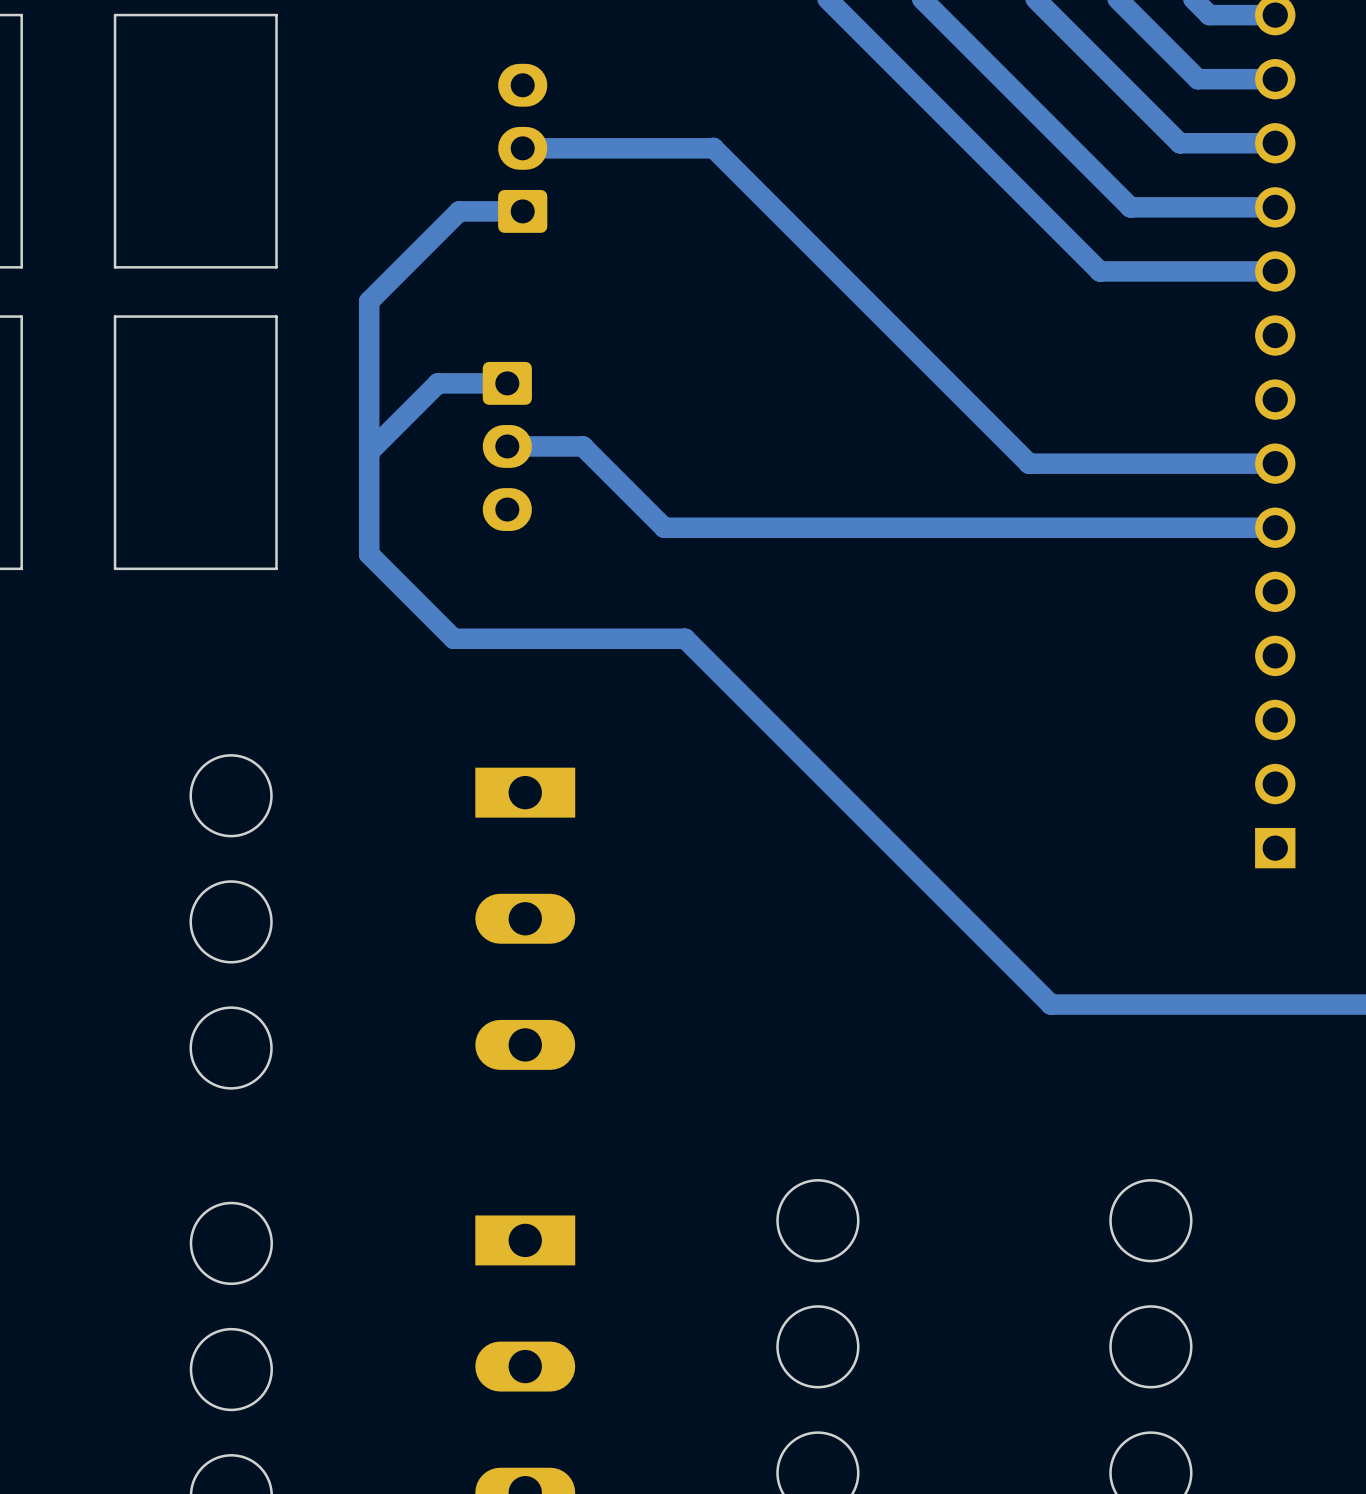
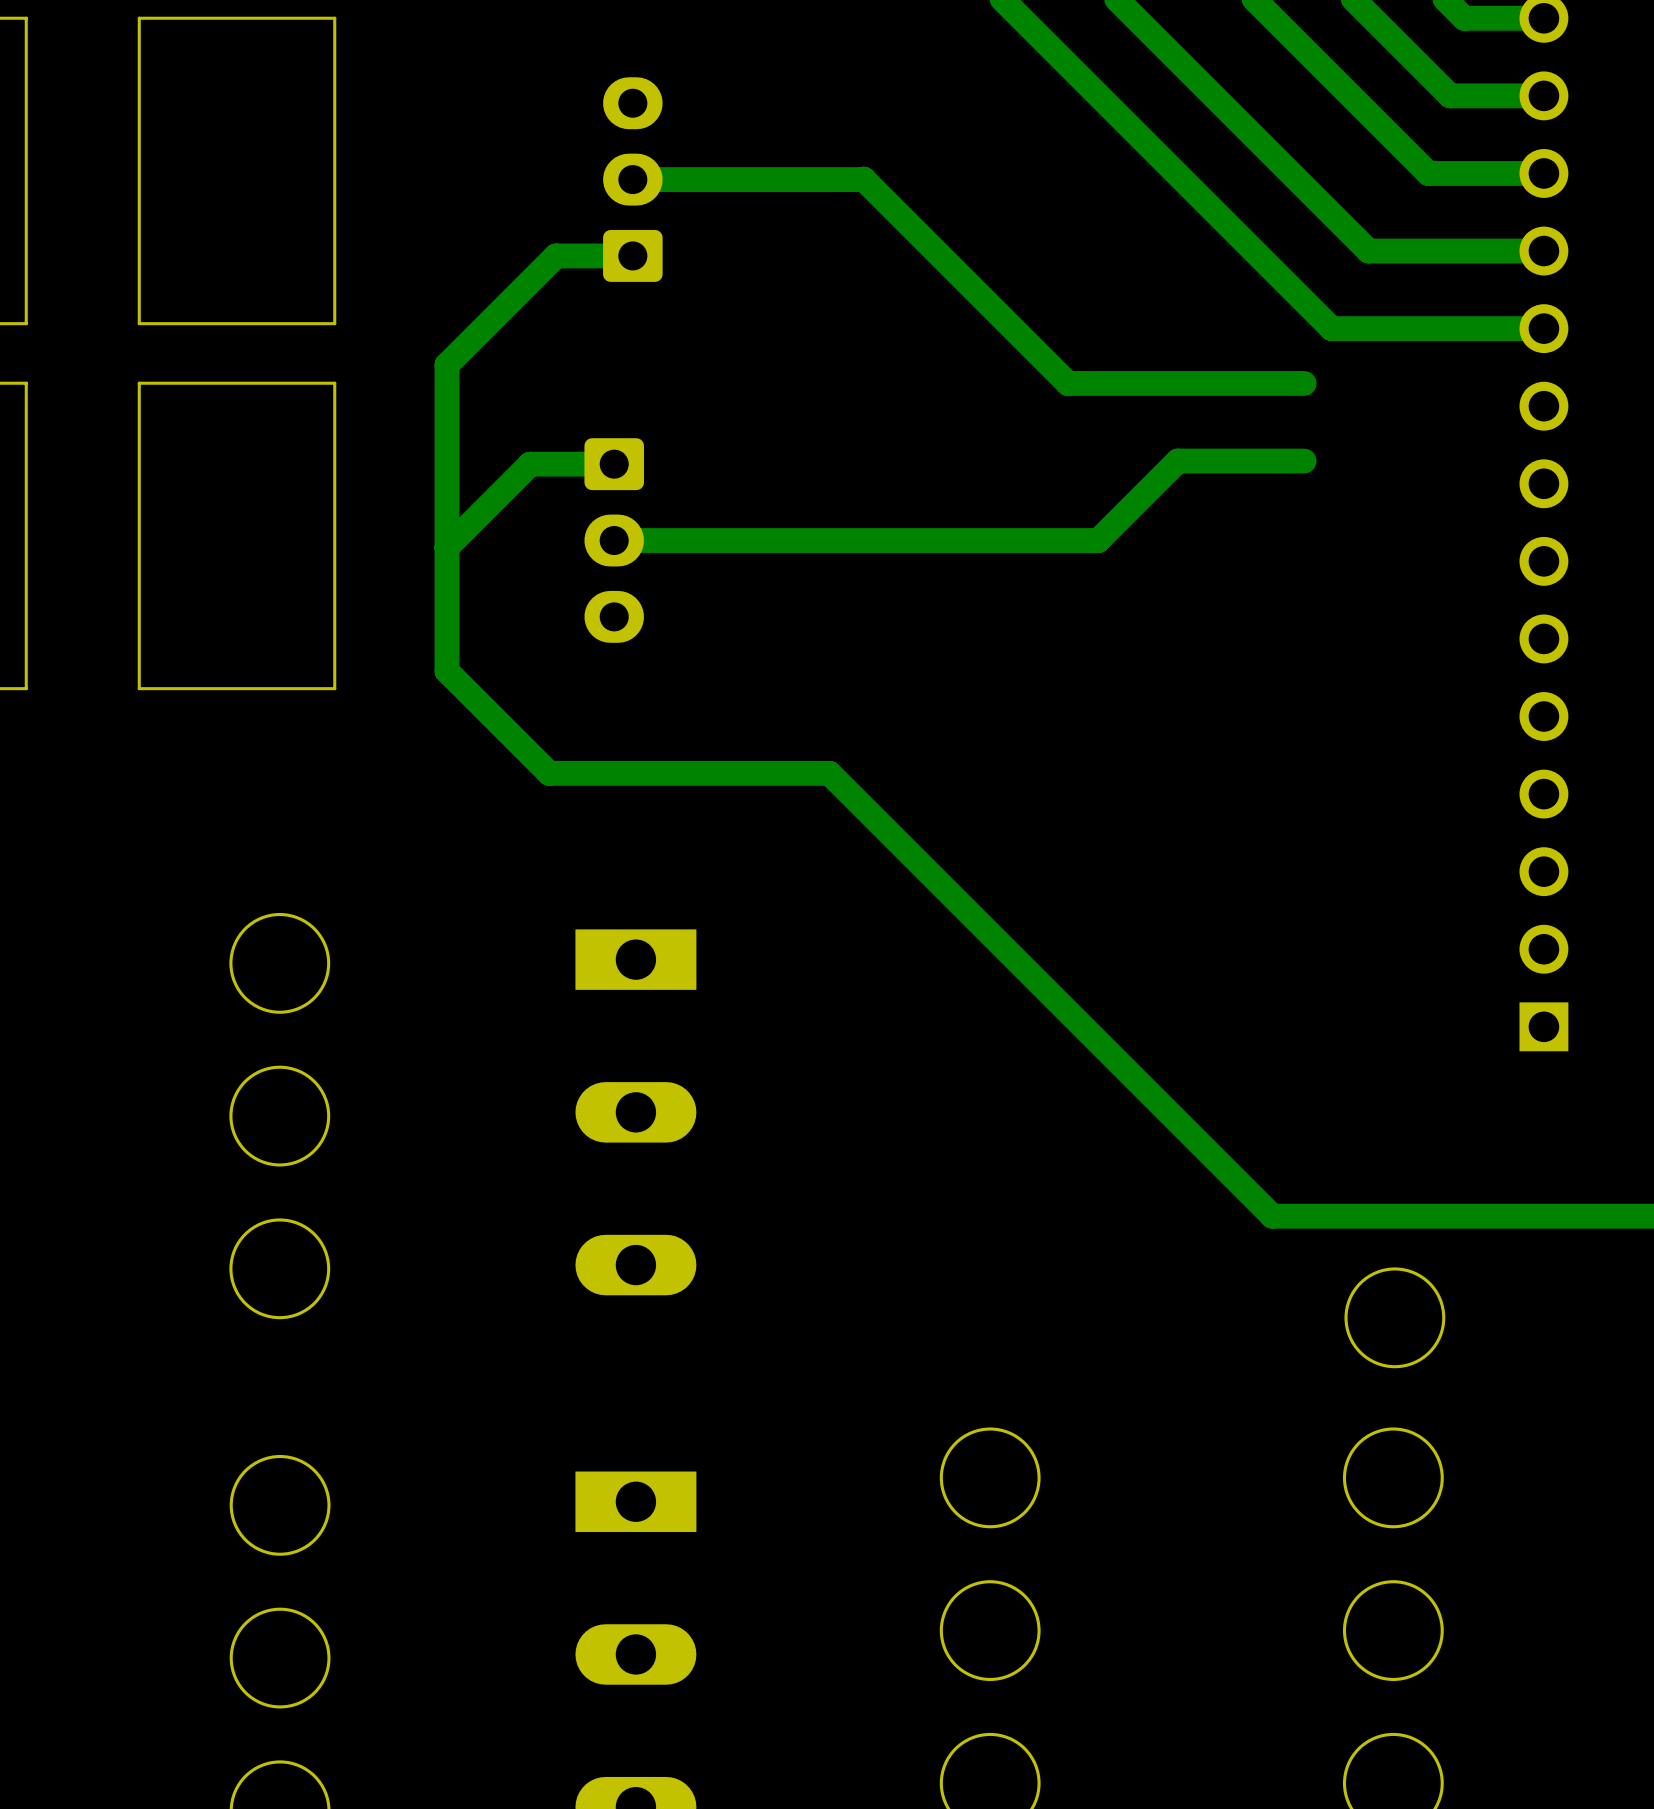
bottom track: (882, 316) (1029, 463) (1275, 463) -> (1067, 383) (1304, 383)
bottom track: (583, 446) (664, 527) (1275, 527) -> (705, 540) (1098, 540) (1177, 461) (1304, 461)
round board edge: none -> [1344, 1267, 1446, 1369]

